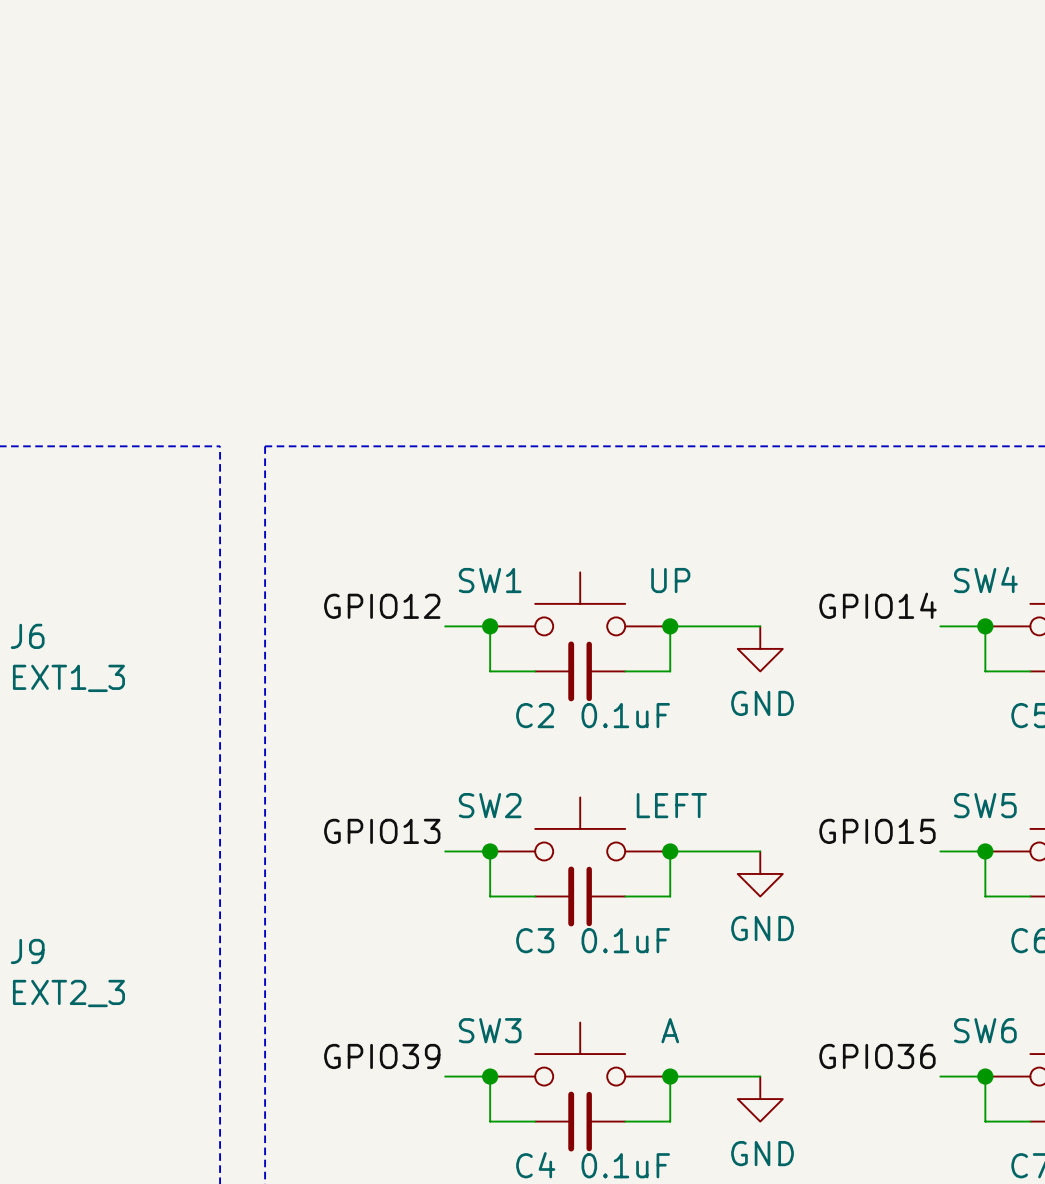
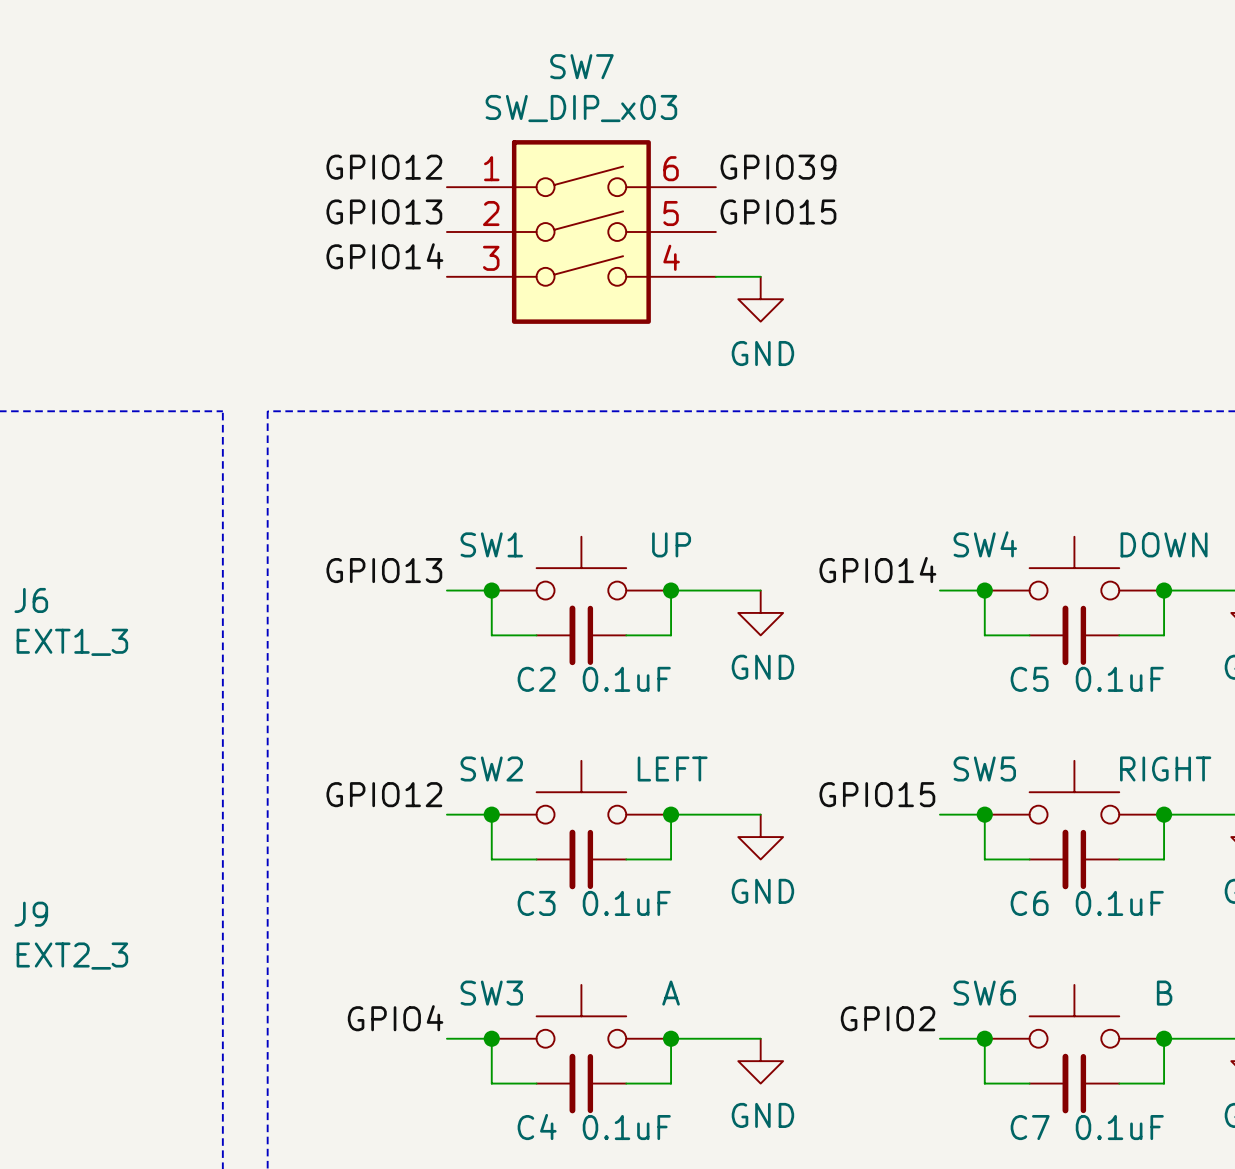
label: none -> GPIO12 (384, 167)
label: none -> GPIO39 (778, 167)
label: none -> GPIO13 (384, 211)
label: none -> GPIO15 (778, 211)
SW7: none -> SW_DIP_x03 (581, 231)
label: none -> GPIO14 (384, 256)
wire: none -> (715, 276) (760, 276)
power symbol: none -> GND (760, 299)
label: GPIO12 (382, 606) -> GPIO13 (384, 570)
label: GPIO13 (382, 831) -> GPIO12 (384, 794)
label: GPIO39 (382, 1056) -> GPIO4 (395, 1018)
label: GPIO36 (877, 1056) -> GPIO2 (888, 1018)

